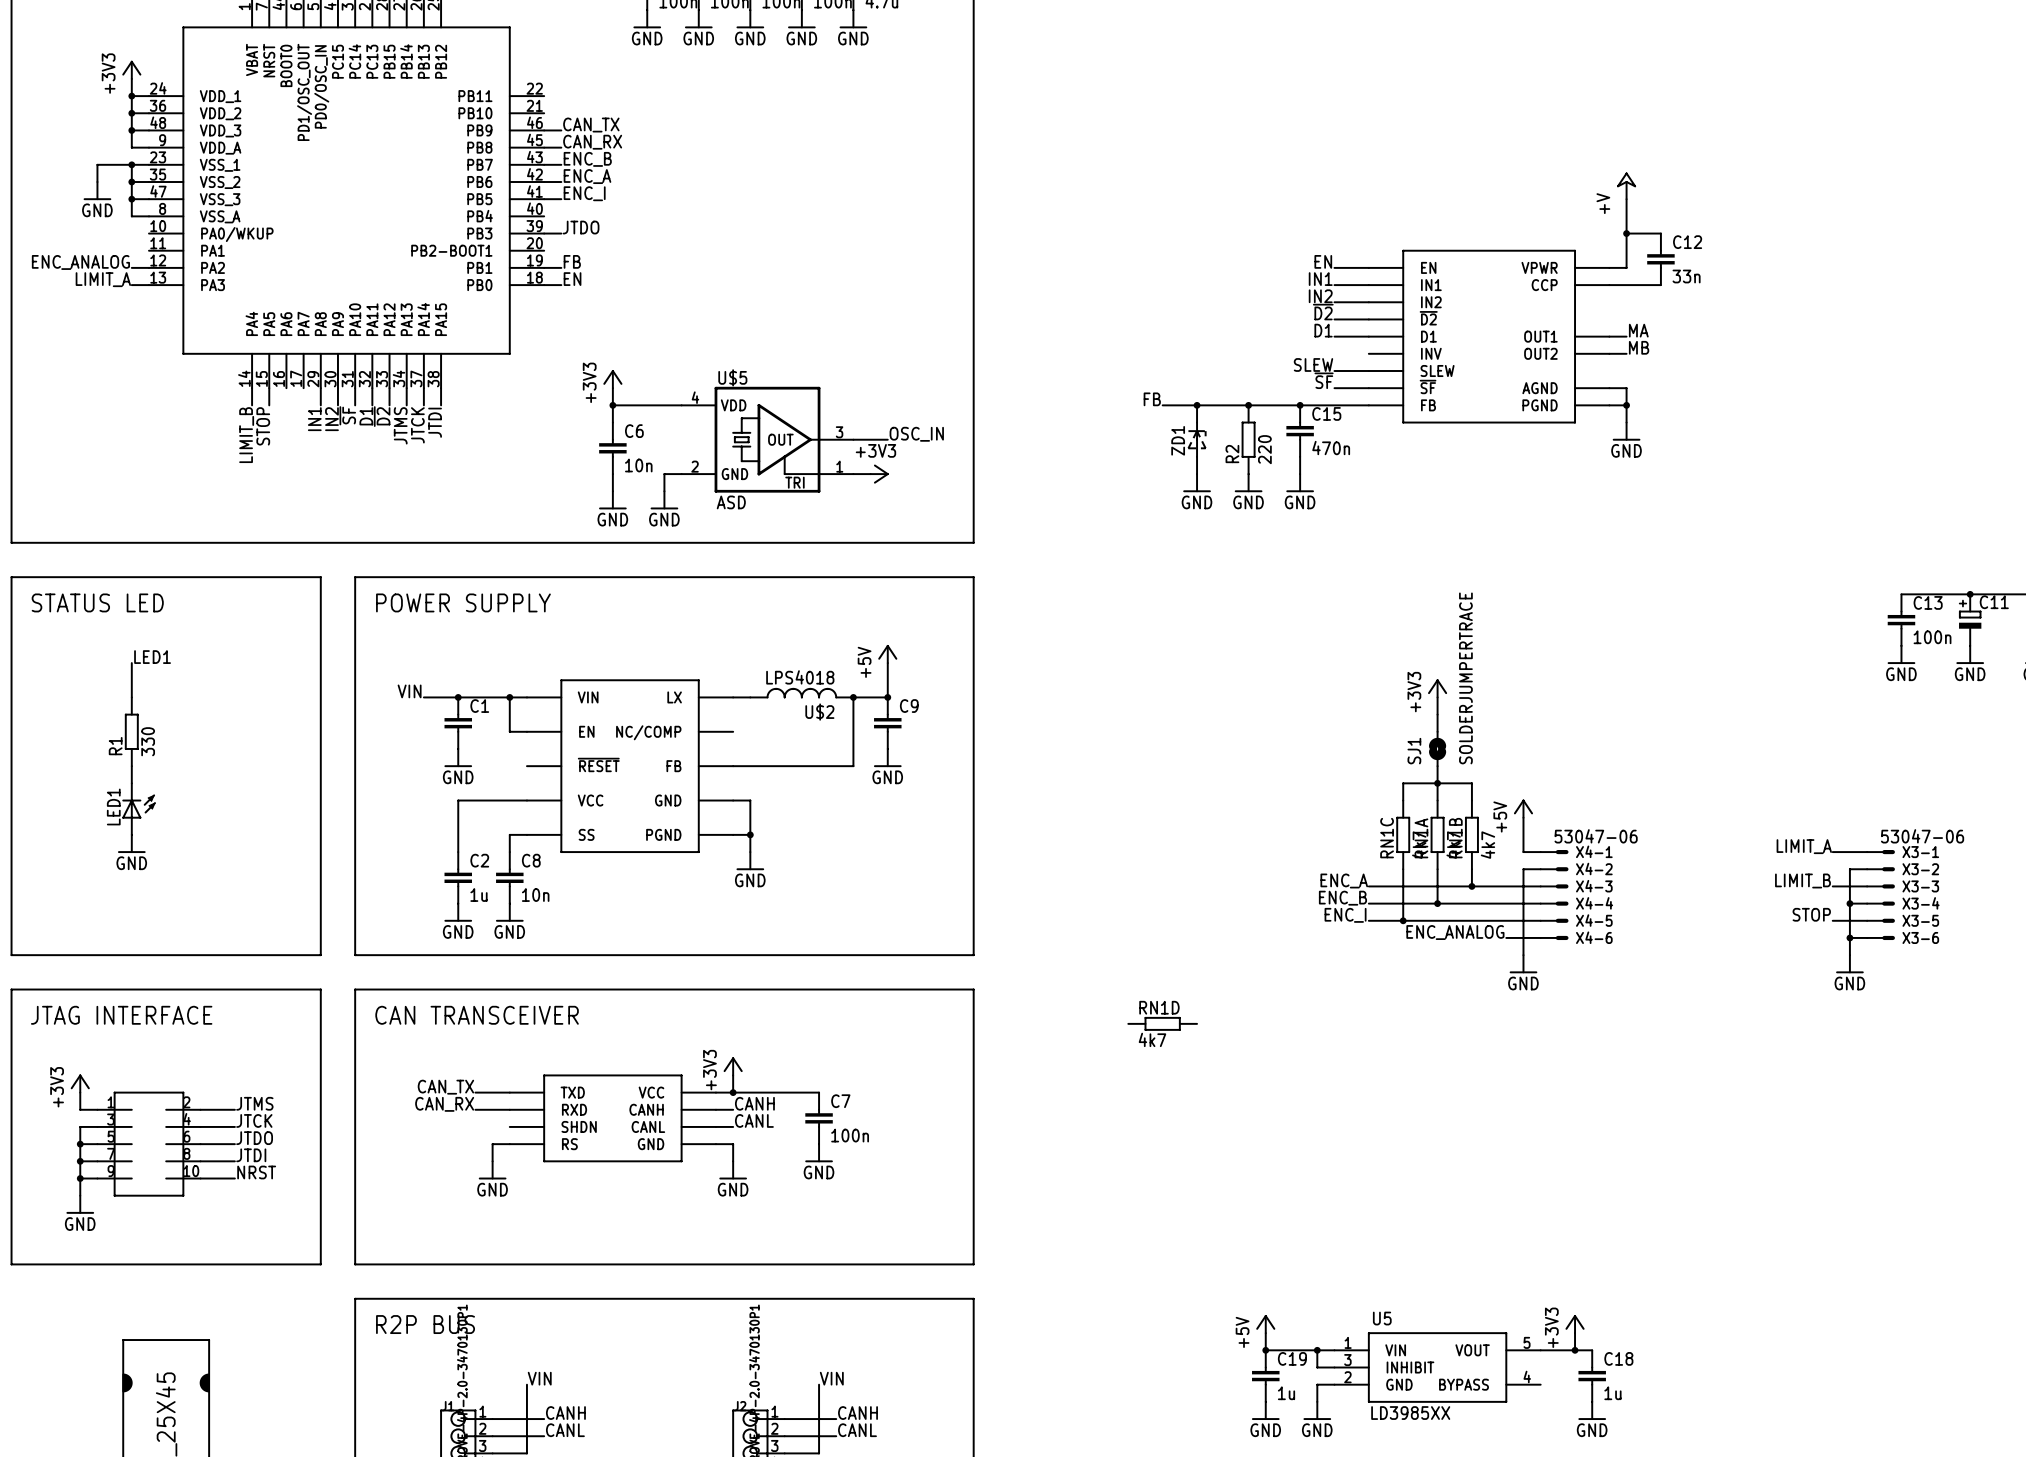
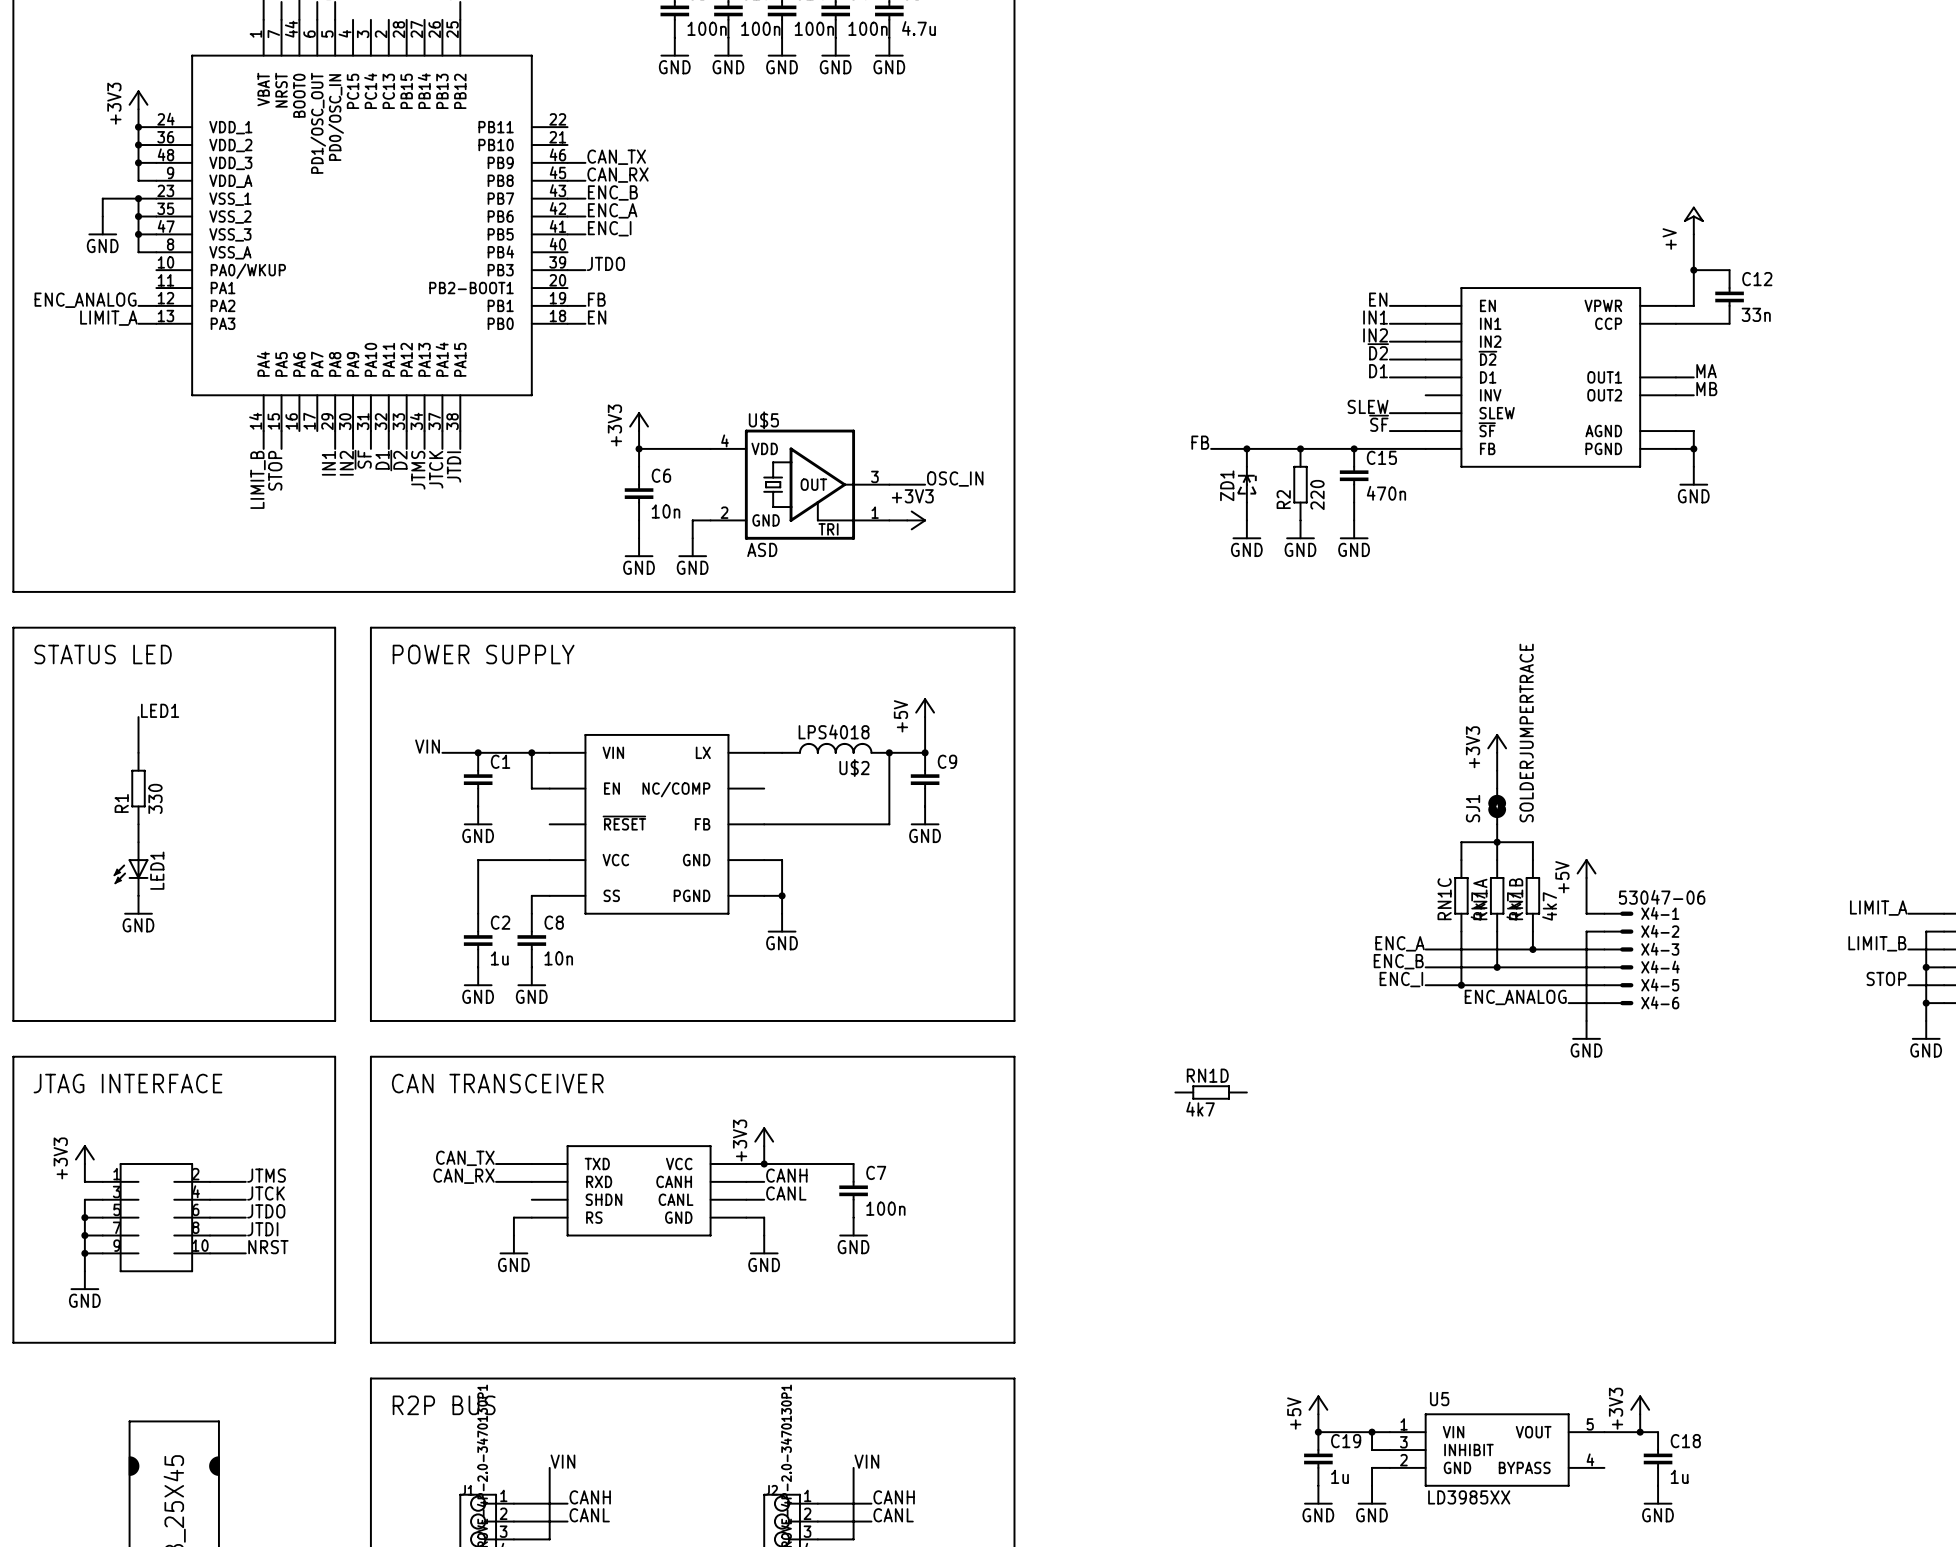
LED1 rotation: 0° (138, 806) -> 180° (131, 871)

